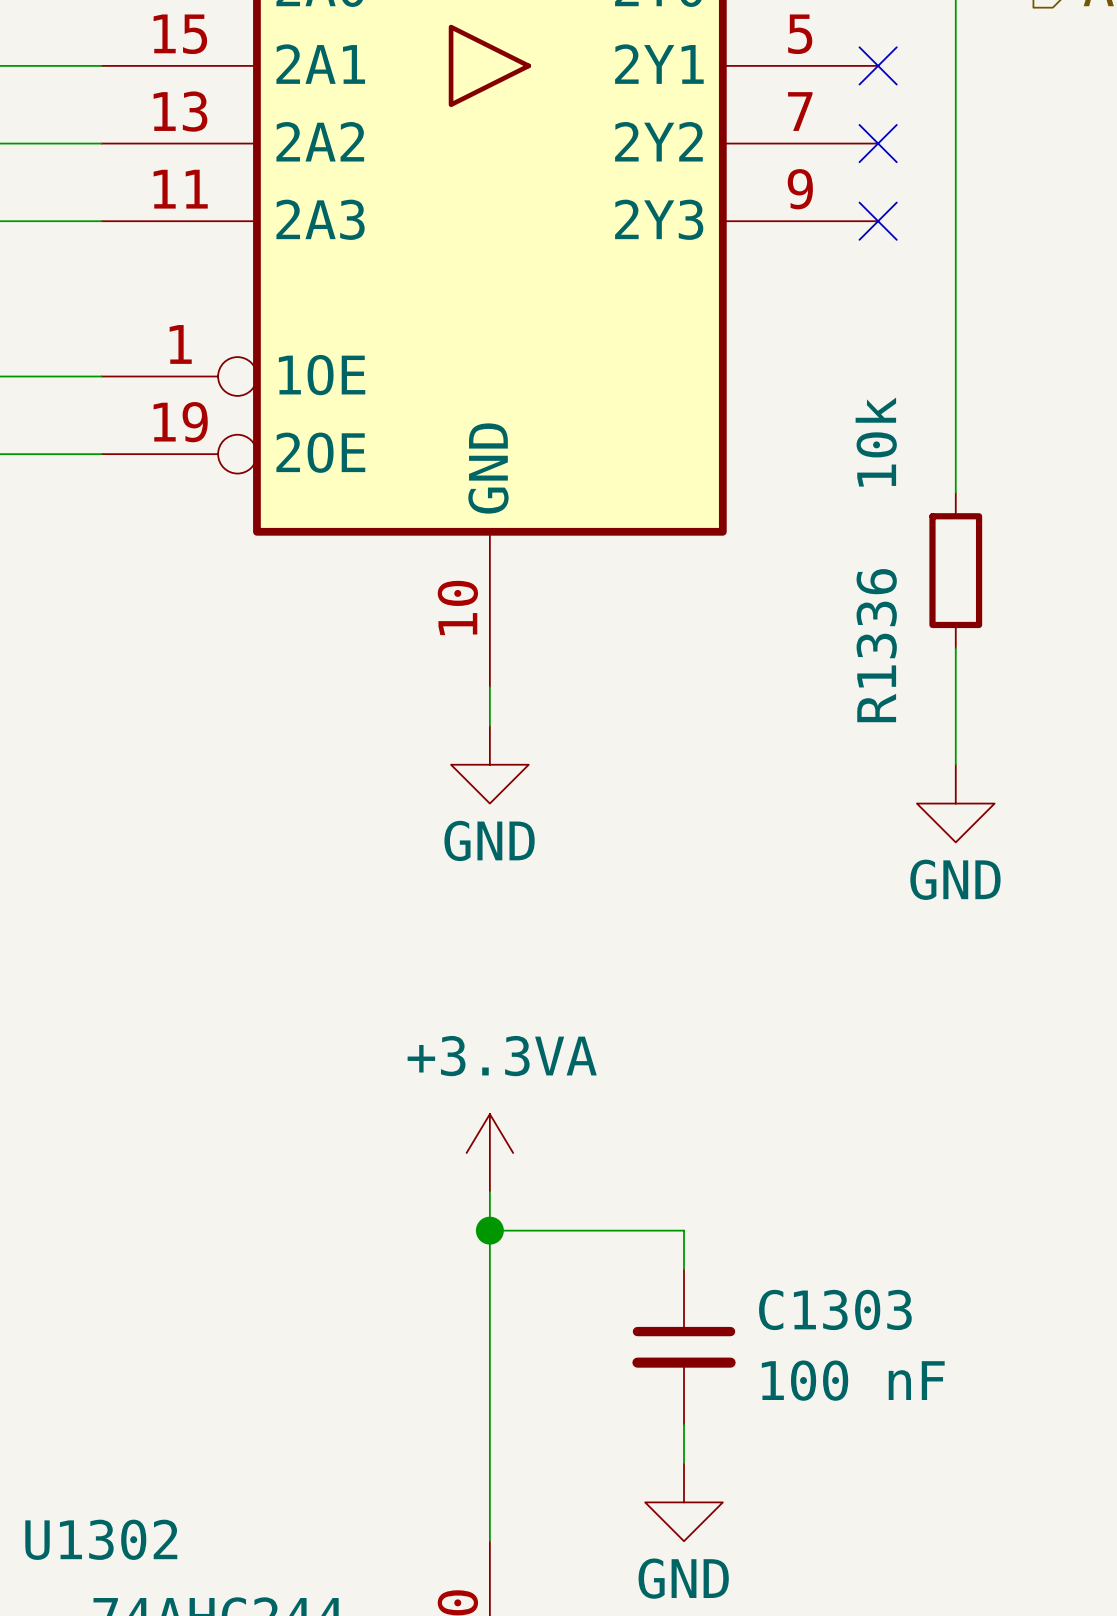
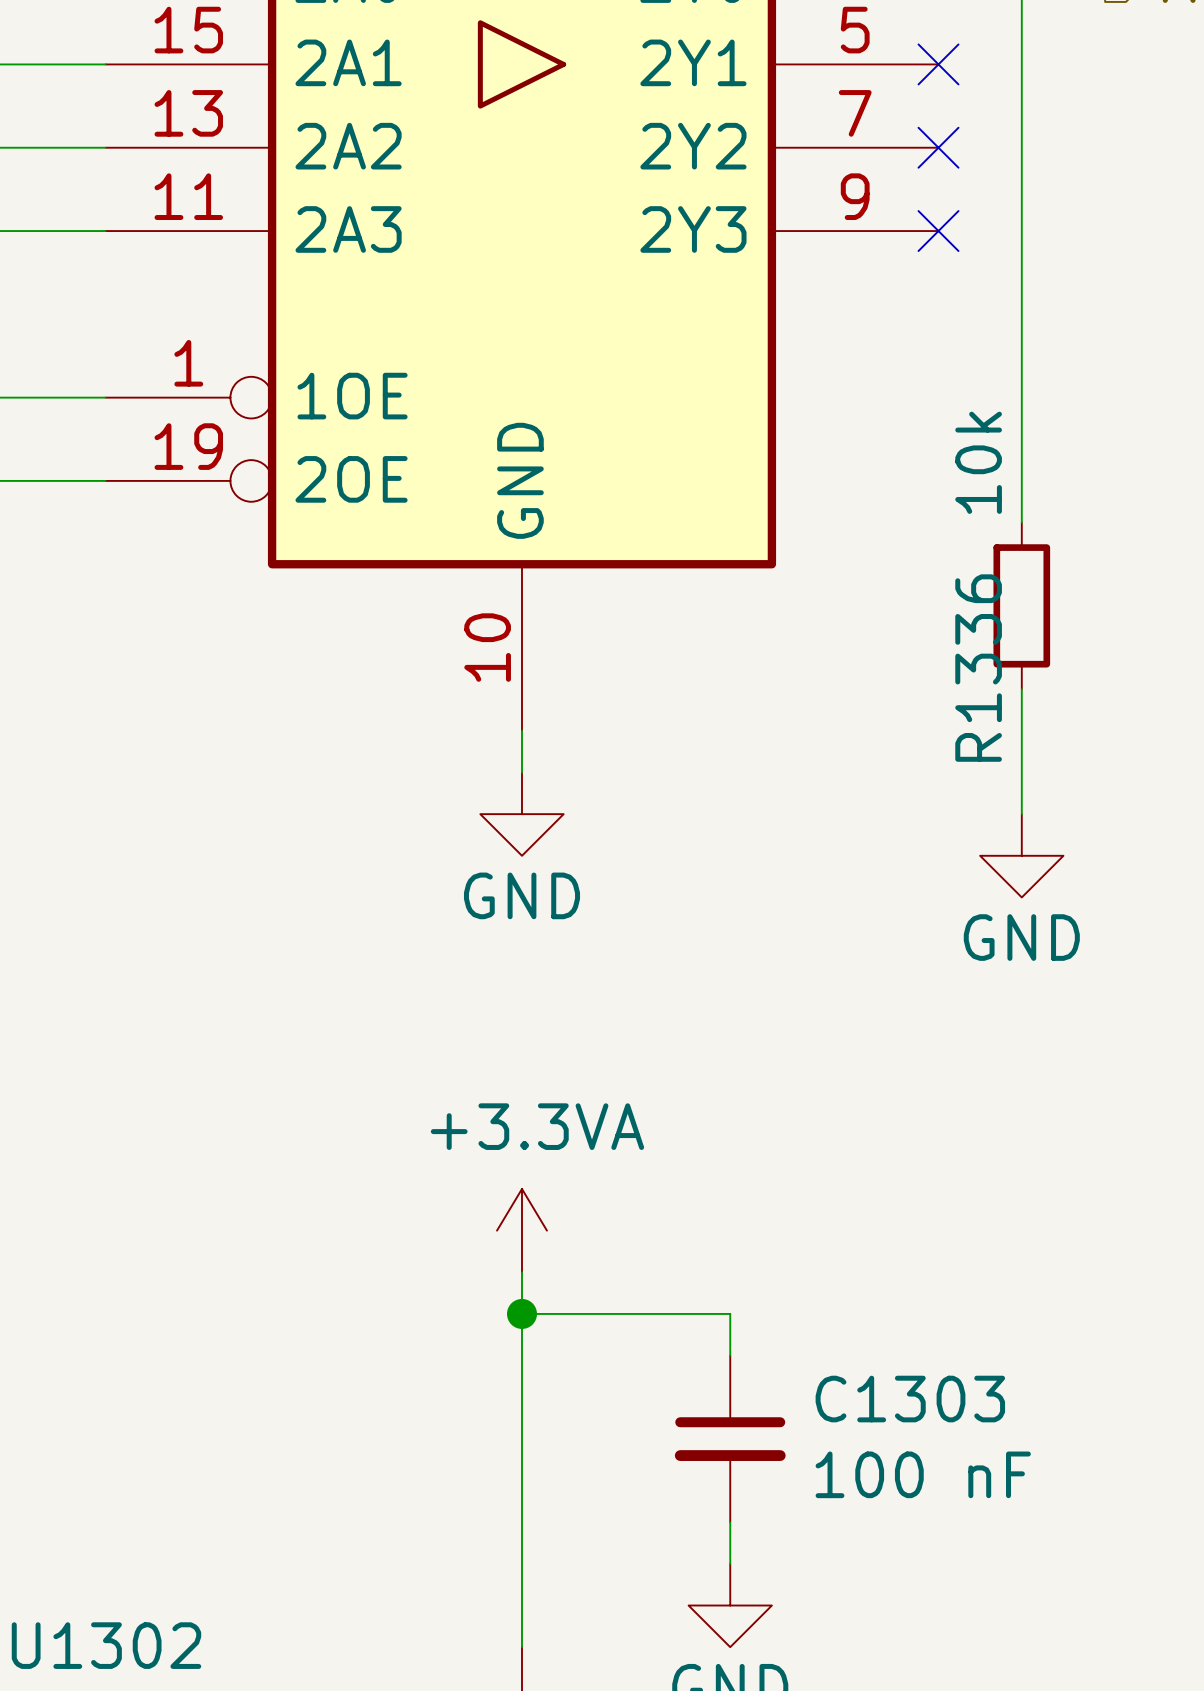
R1336 value position: 10k (876, 442) -> 10k (978, 462)
R1336 name position: R1336 (876, 645) -> R1336 (978, 668)

